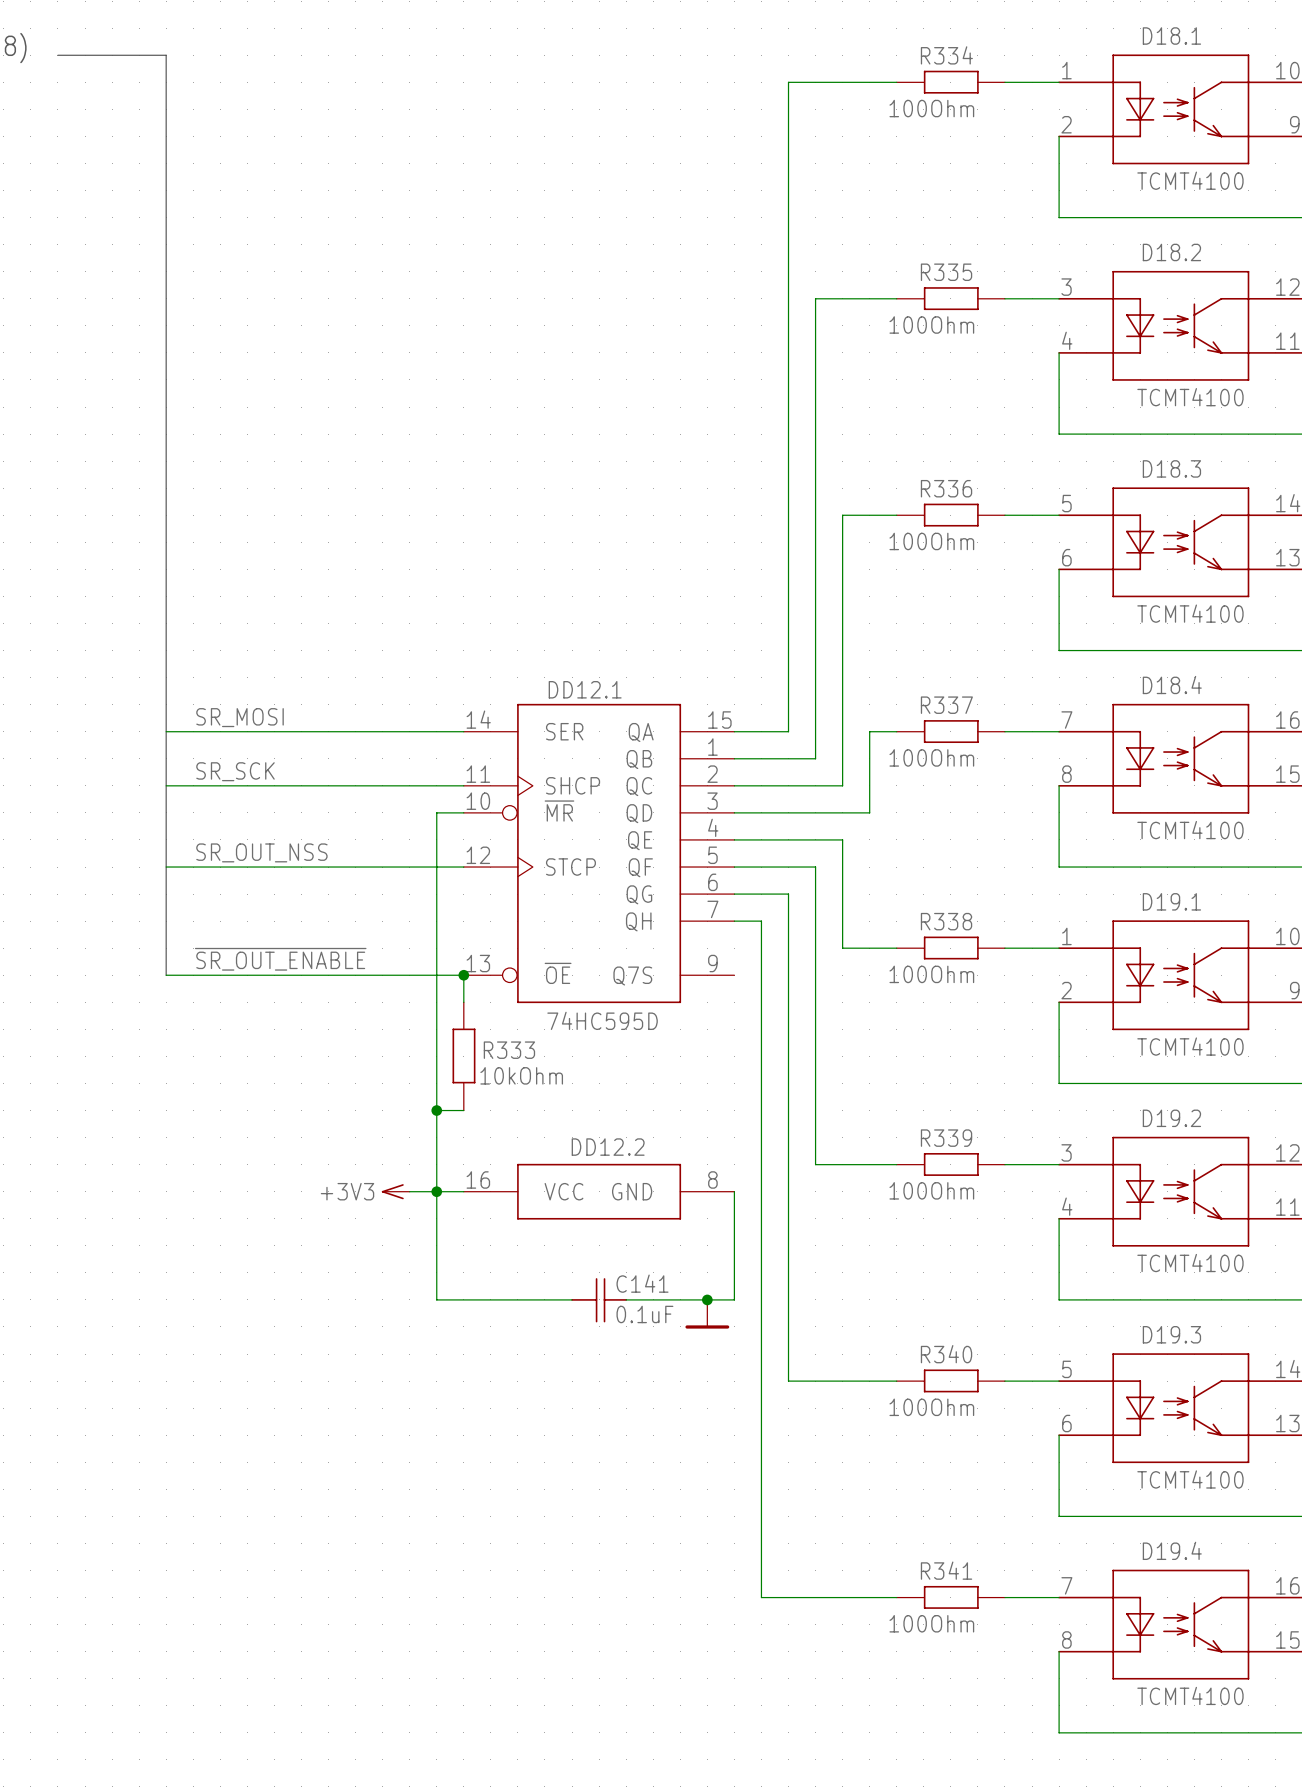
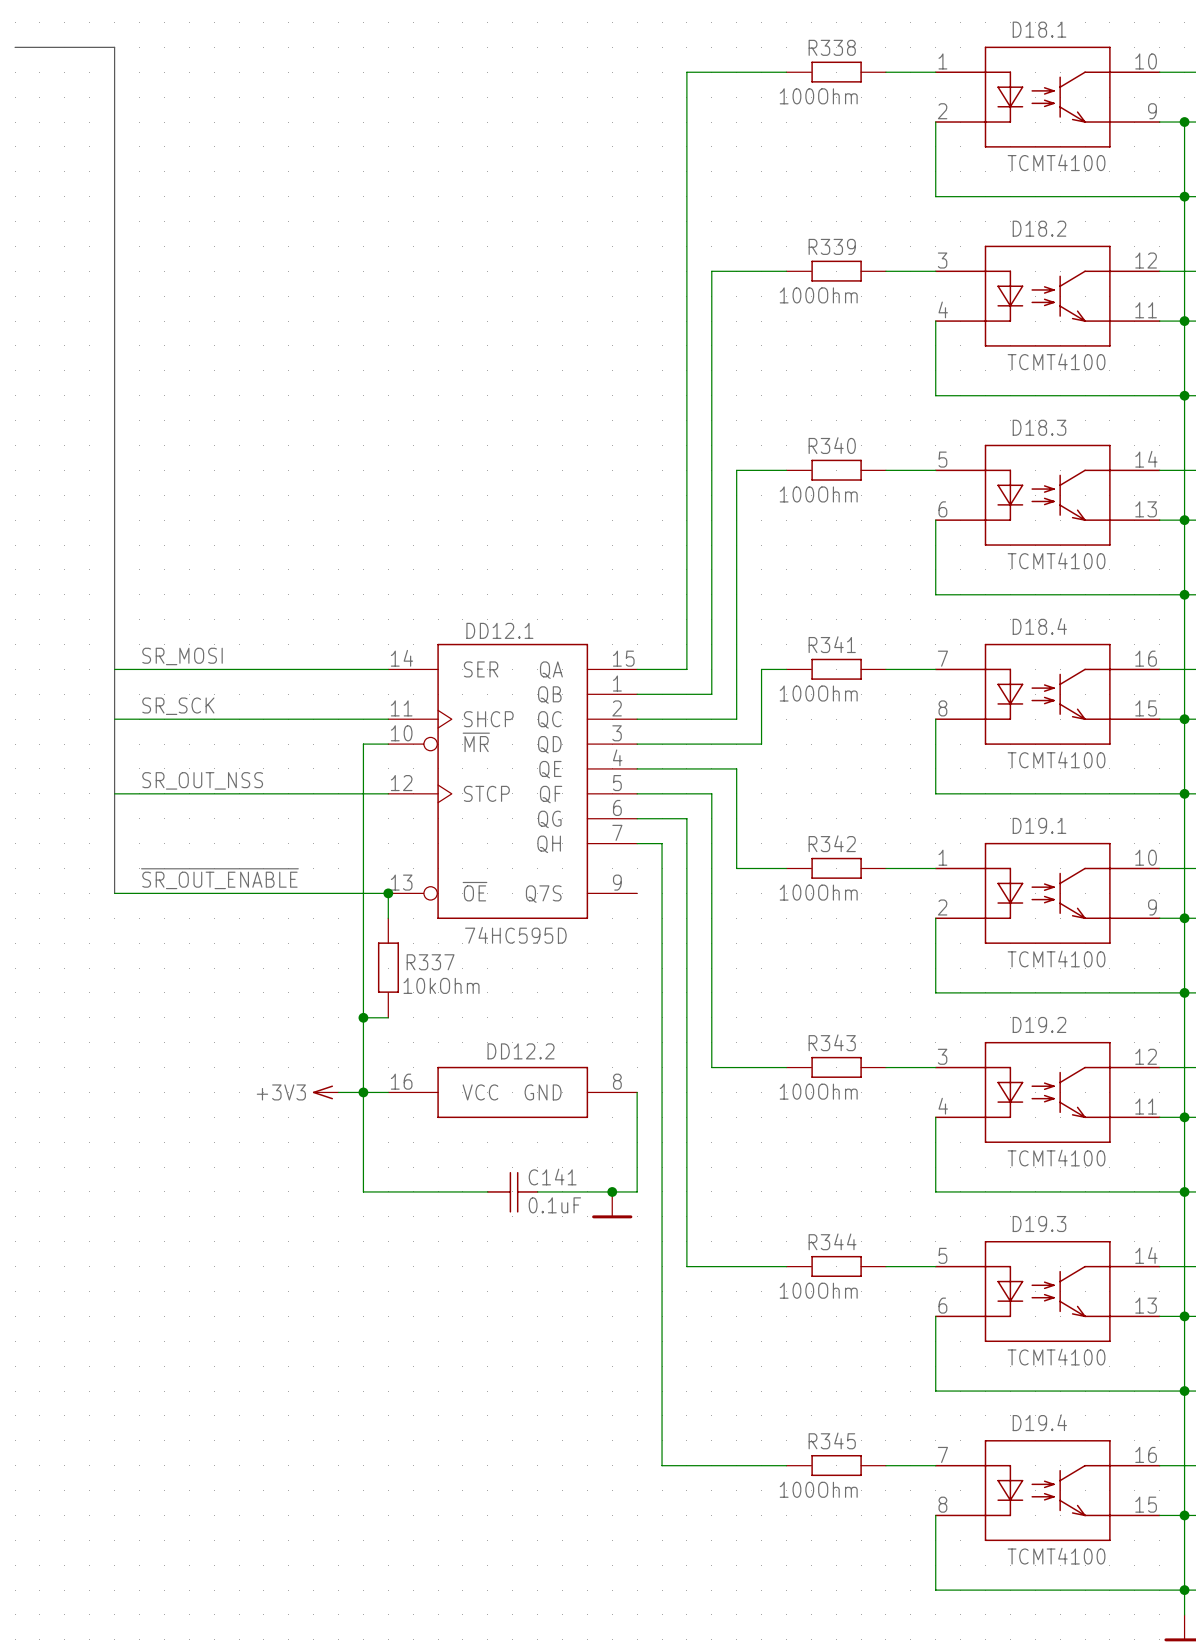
R334 name: R334 (946, 55) -> R338 (832, 47)
R335 name: R335 (946, 272) -> R339 (832, 246)
R336 name: R336 (946, 488) -> R340 (832, 445)
R337 name: R337 (946, 705) -> R341 (832, 644)
R338 name: R338 (946, 921) -> R342 (832, 843)
R333 name: R333 (509, 1050) -> R337 (430, 962)
R339 name: R339 (946, 1138) -> R343 (832, 1042)
R340 name: R340 (946, 1354) -> R344 (832, 1241)
R341 name: R341 (946, 1570) -> R345 (832, 1440)

